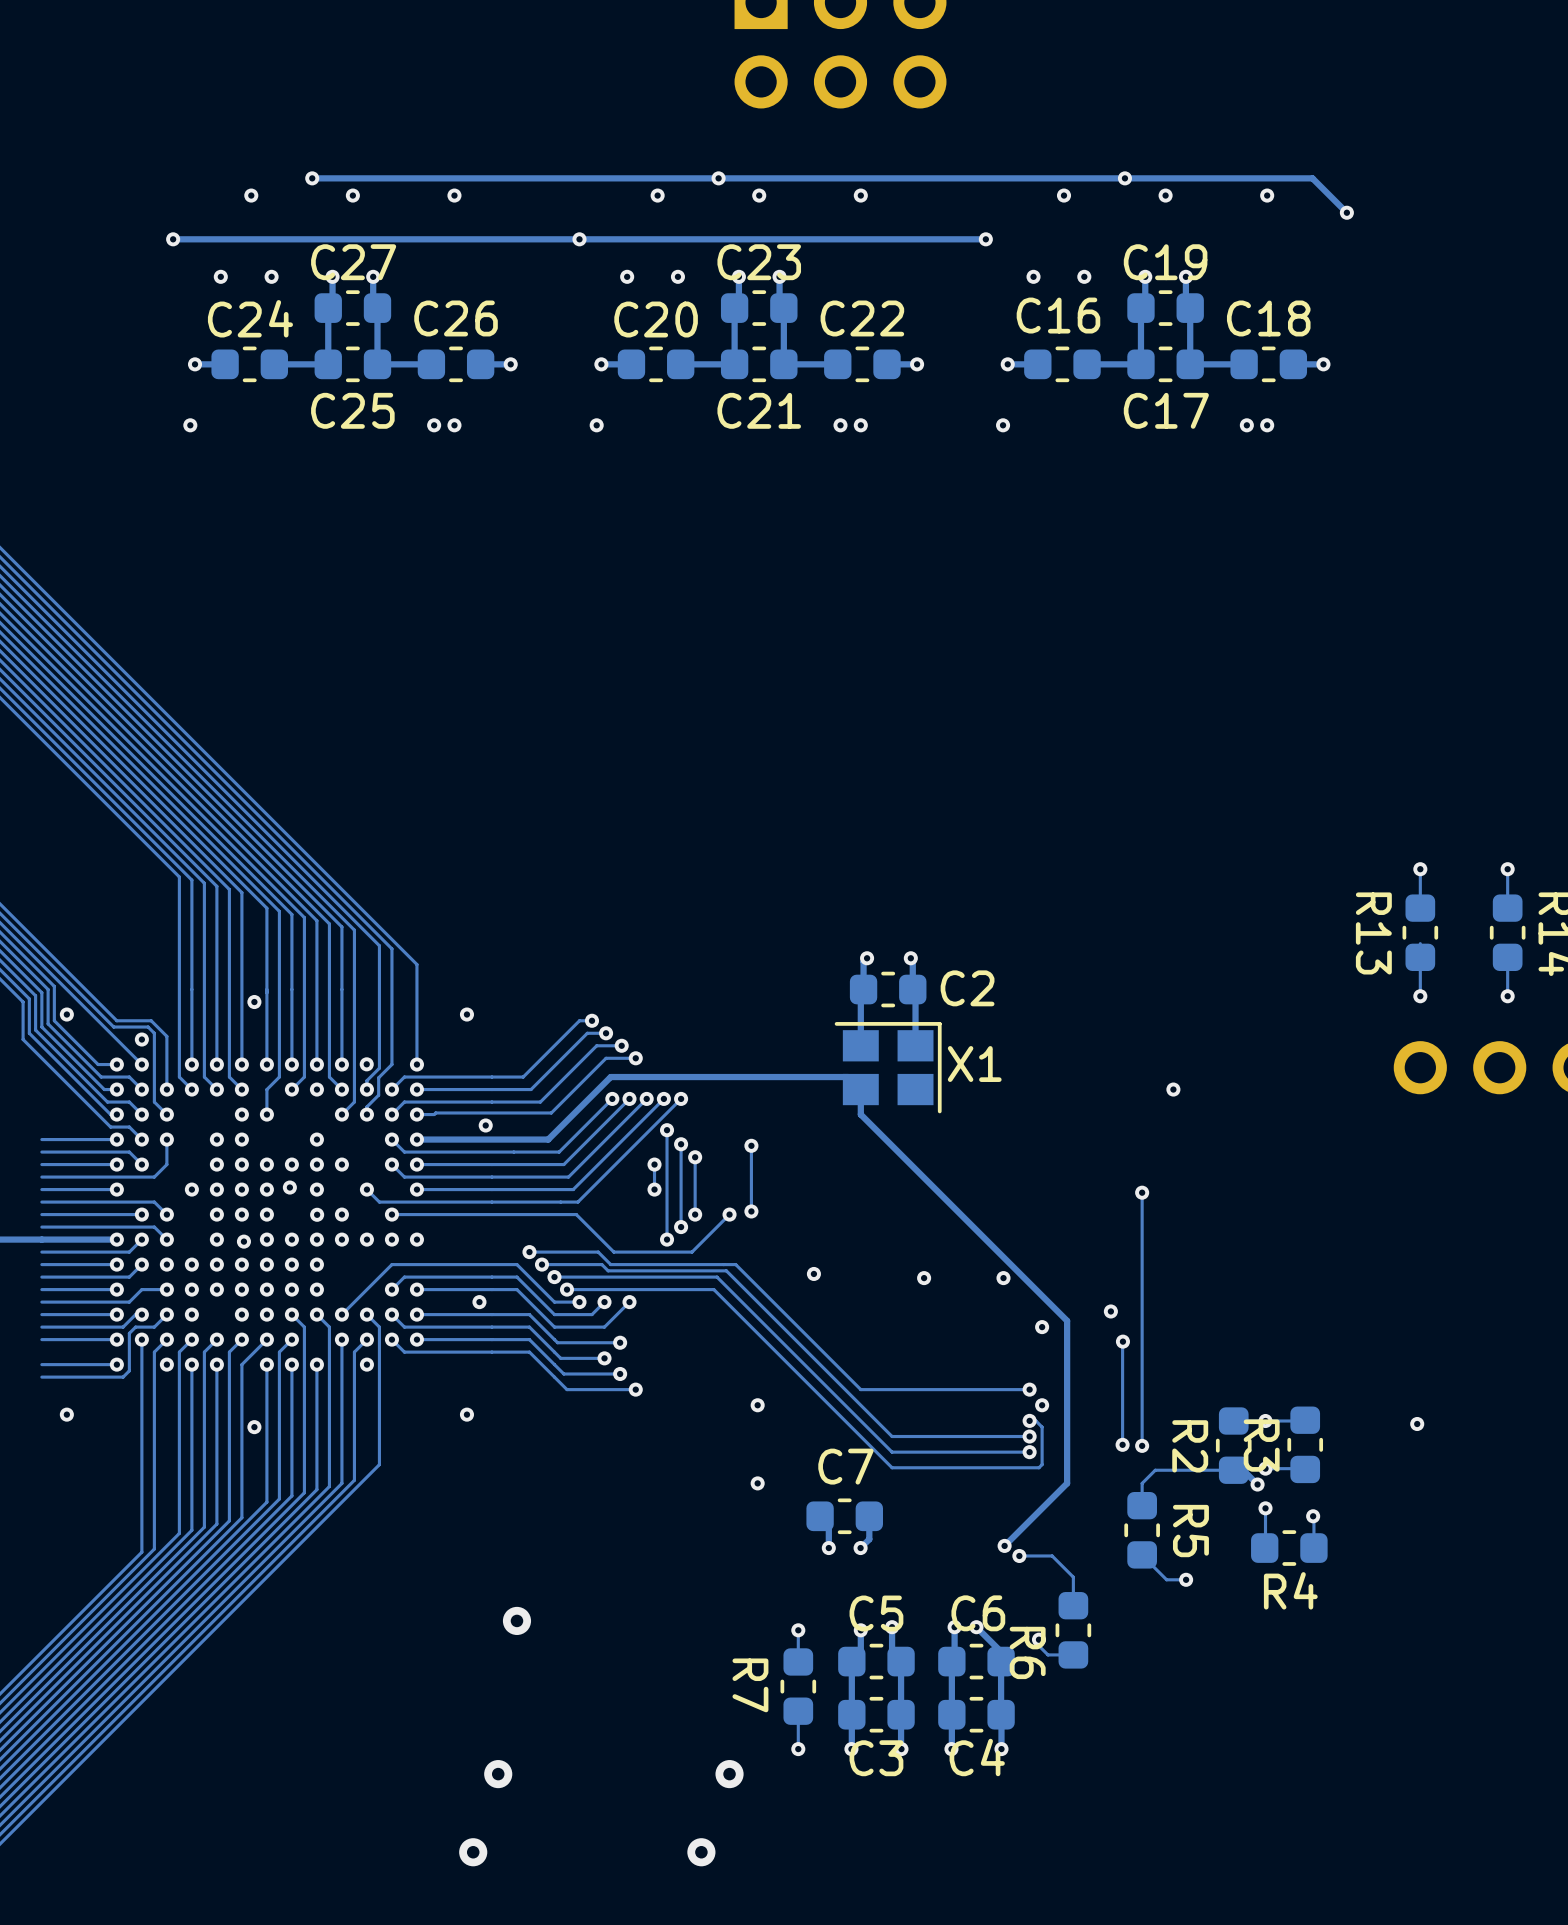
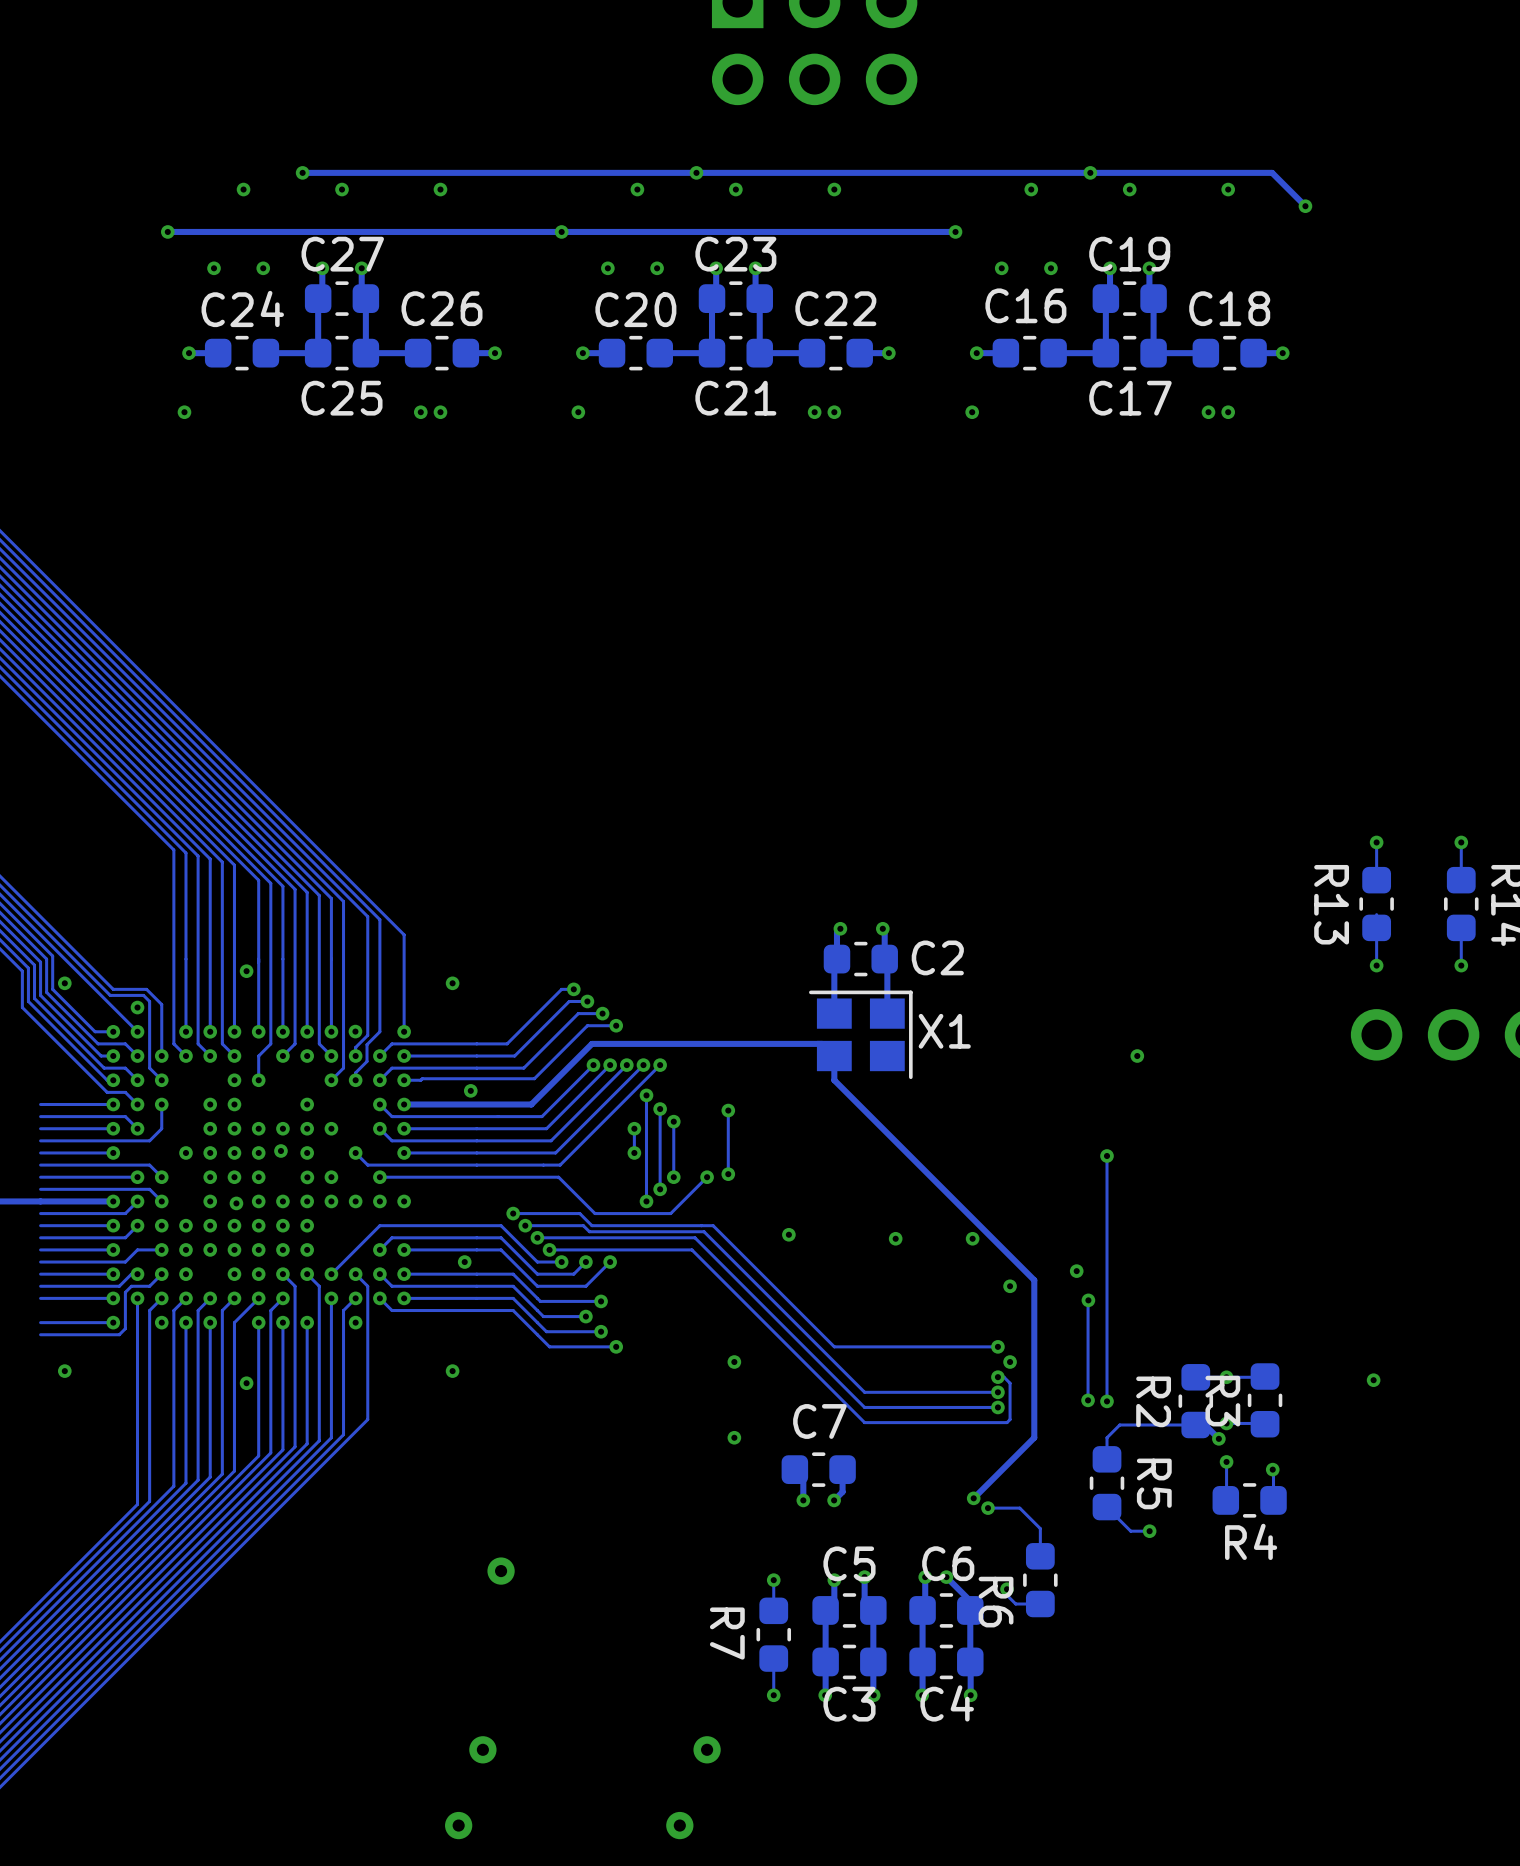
via: (498, 1774) -> none
via: (729, 1774) -> none
via: none -> (482, 1749)
via: none -> (707, 1749)
via: (473, 1852) -> none
via: (701, 1852) -> none
via: none -> (458, 1825)
via: none -> (679, 1825)

